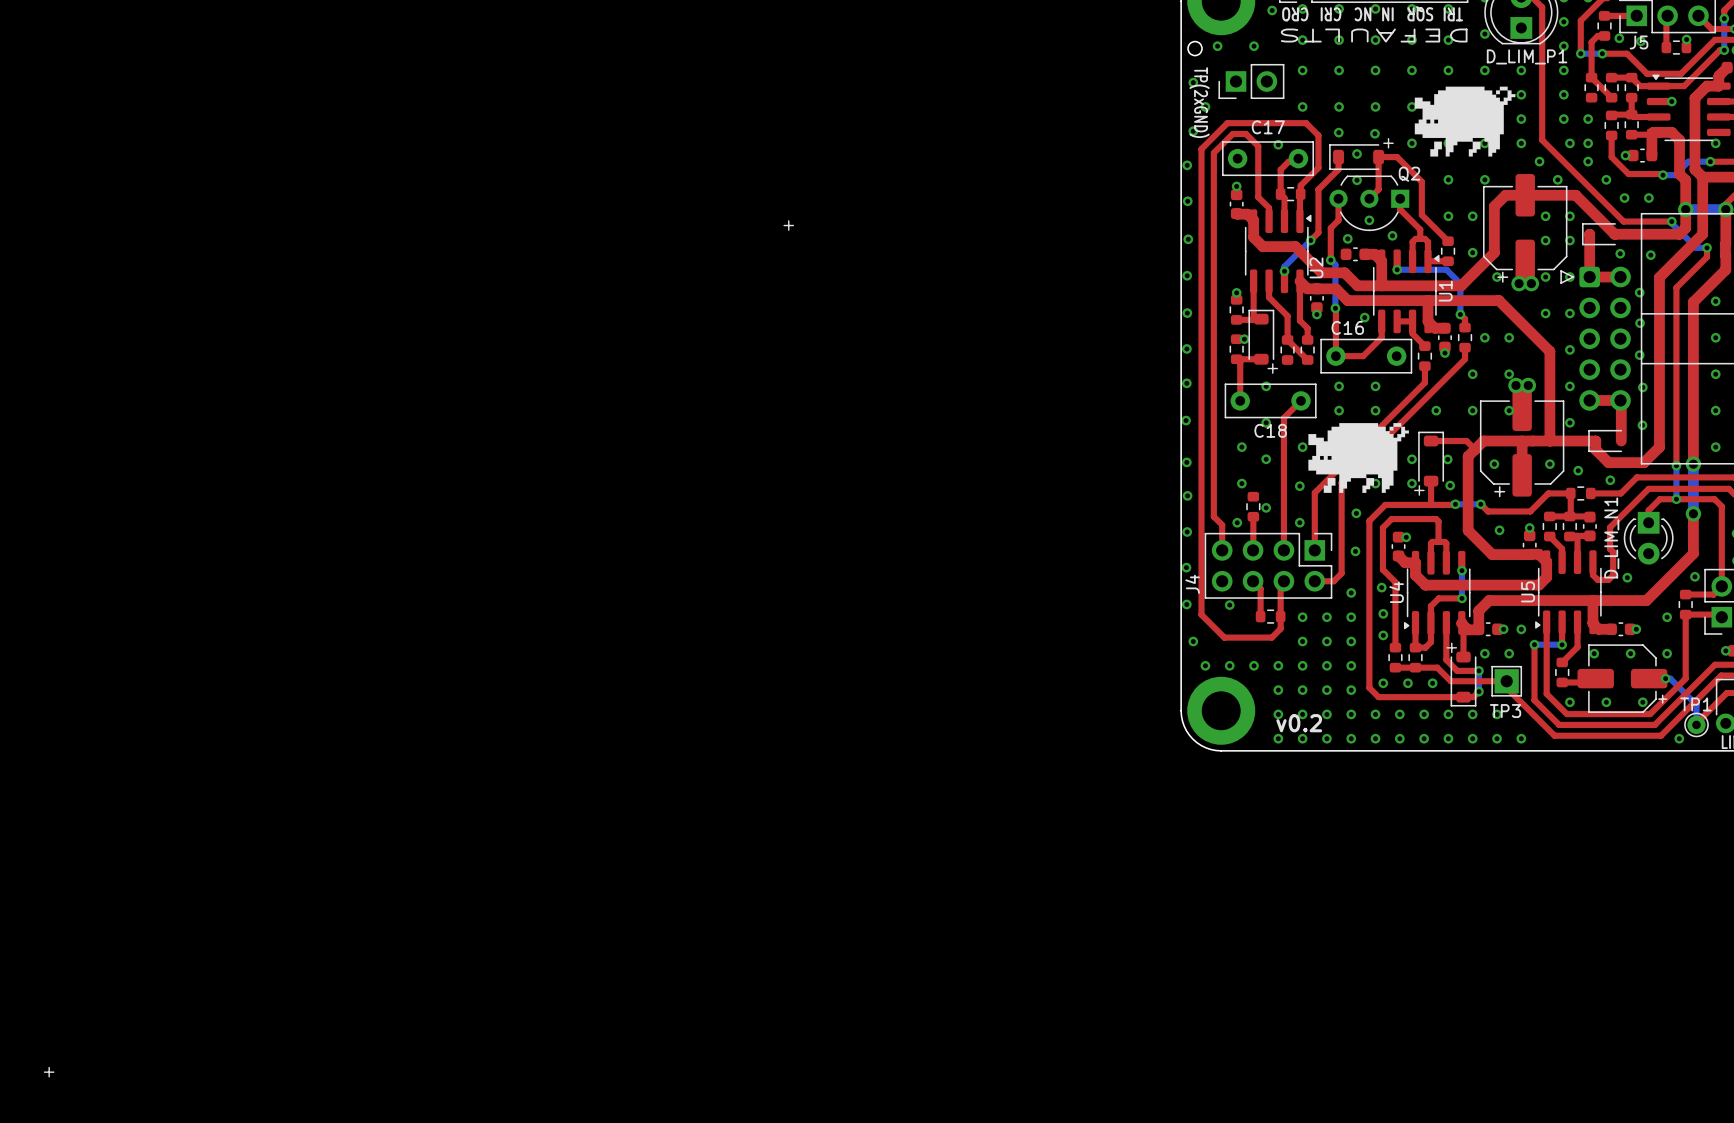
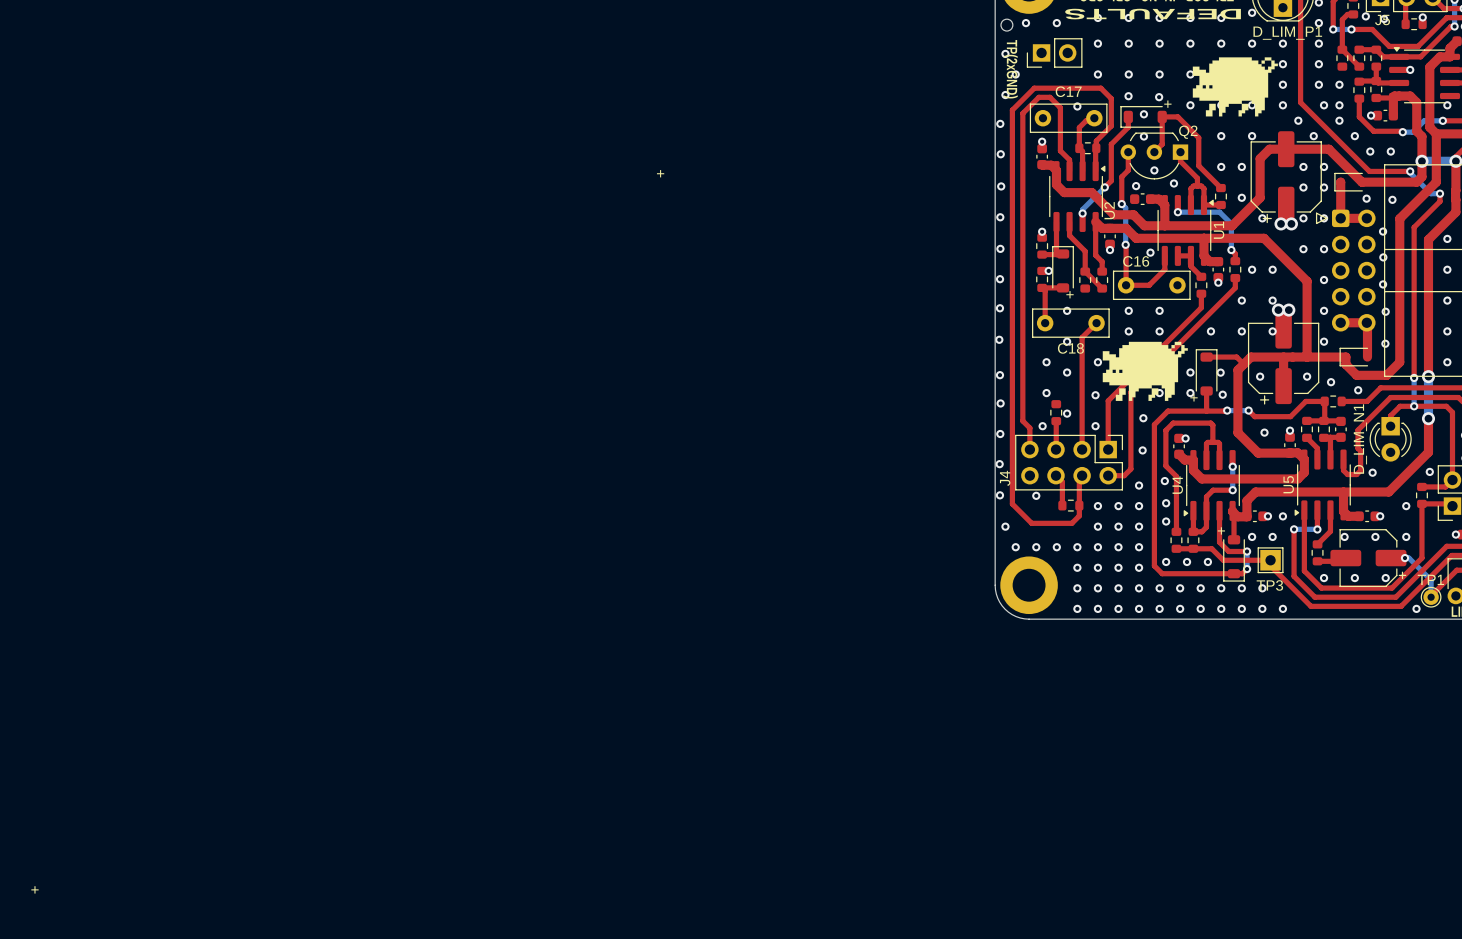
text: v0.2 (1299, 723) -> none

